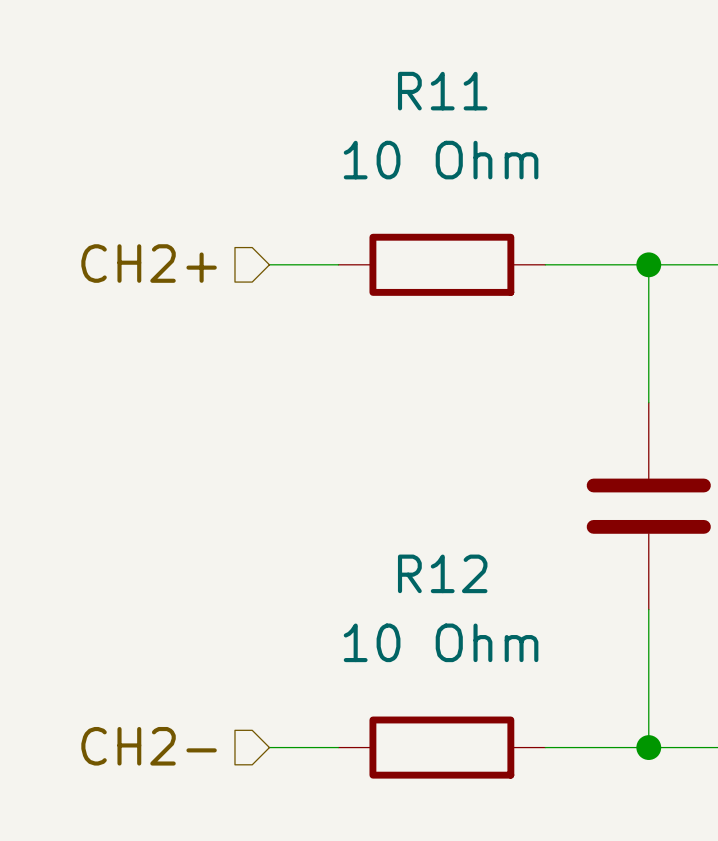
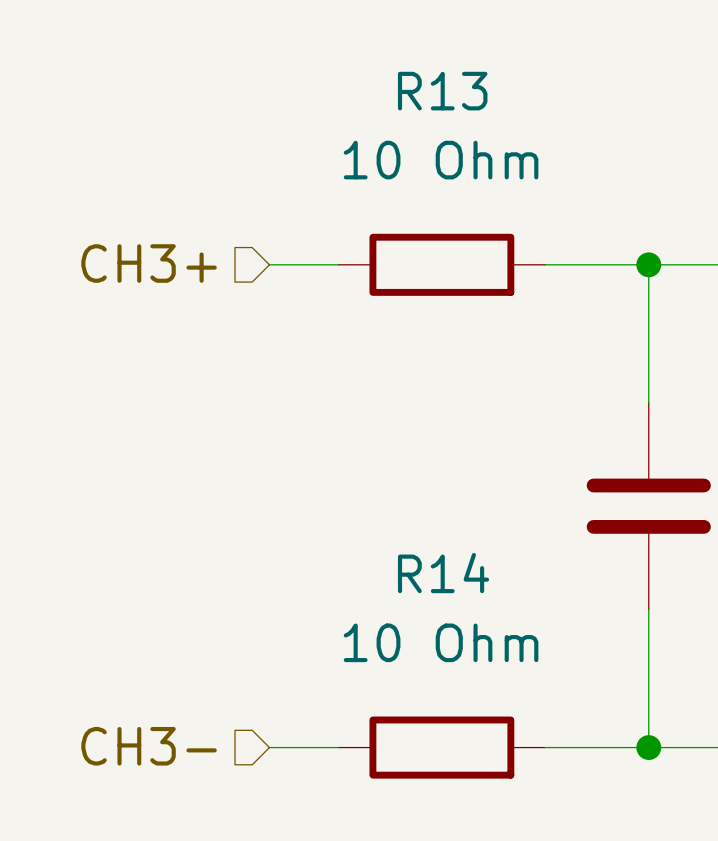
R11 name: R11 (442, 91) -> R13 (442, 91)
hierarchical label: CH2+ (149, 263) -> CH3+ (149, 263)
R12 name: R12 (442, 573) -> R14 (443, 573)
hierarchical label: CH2- (149, 746) -> CH3- (149, 746)

